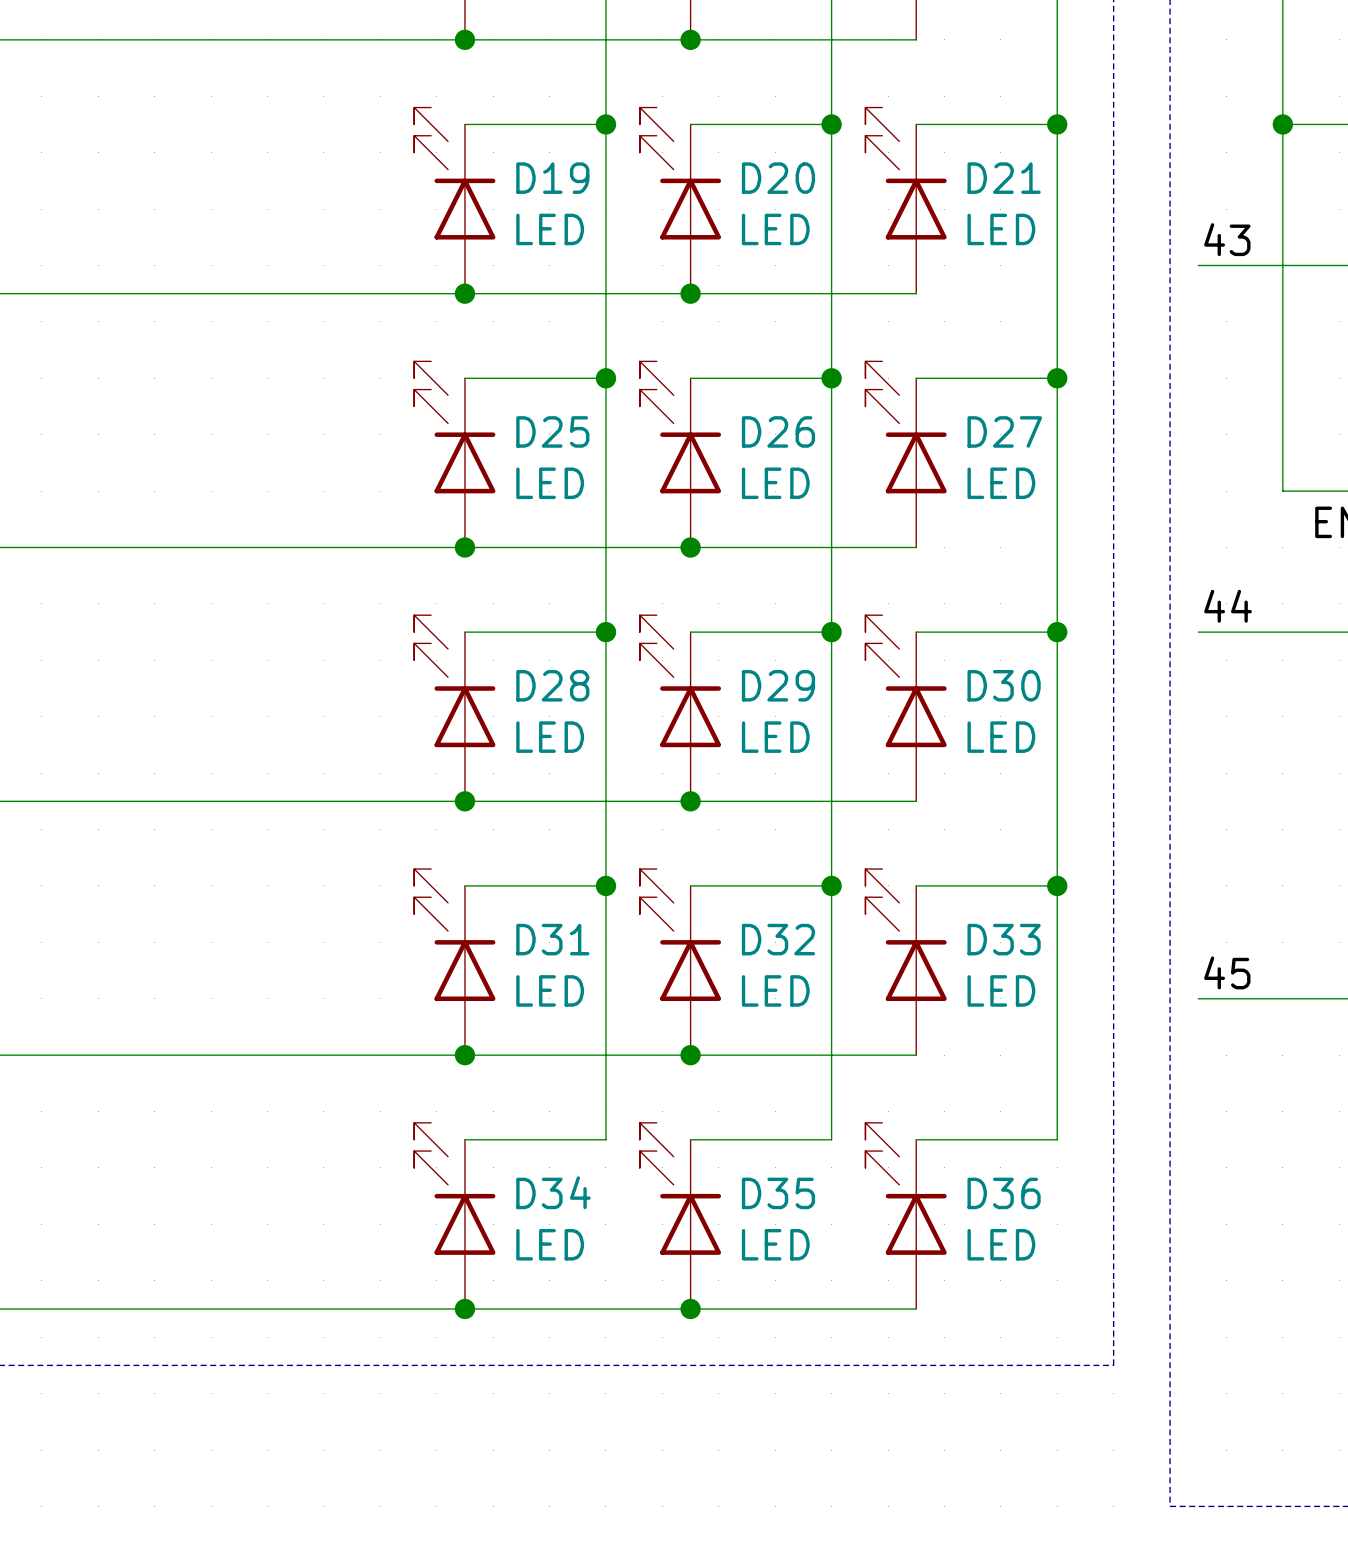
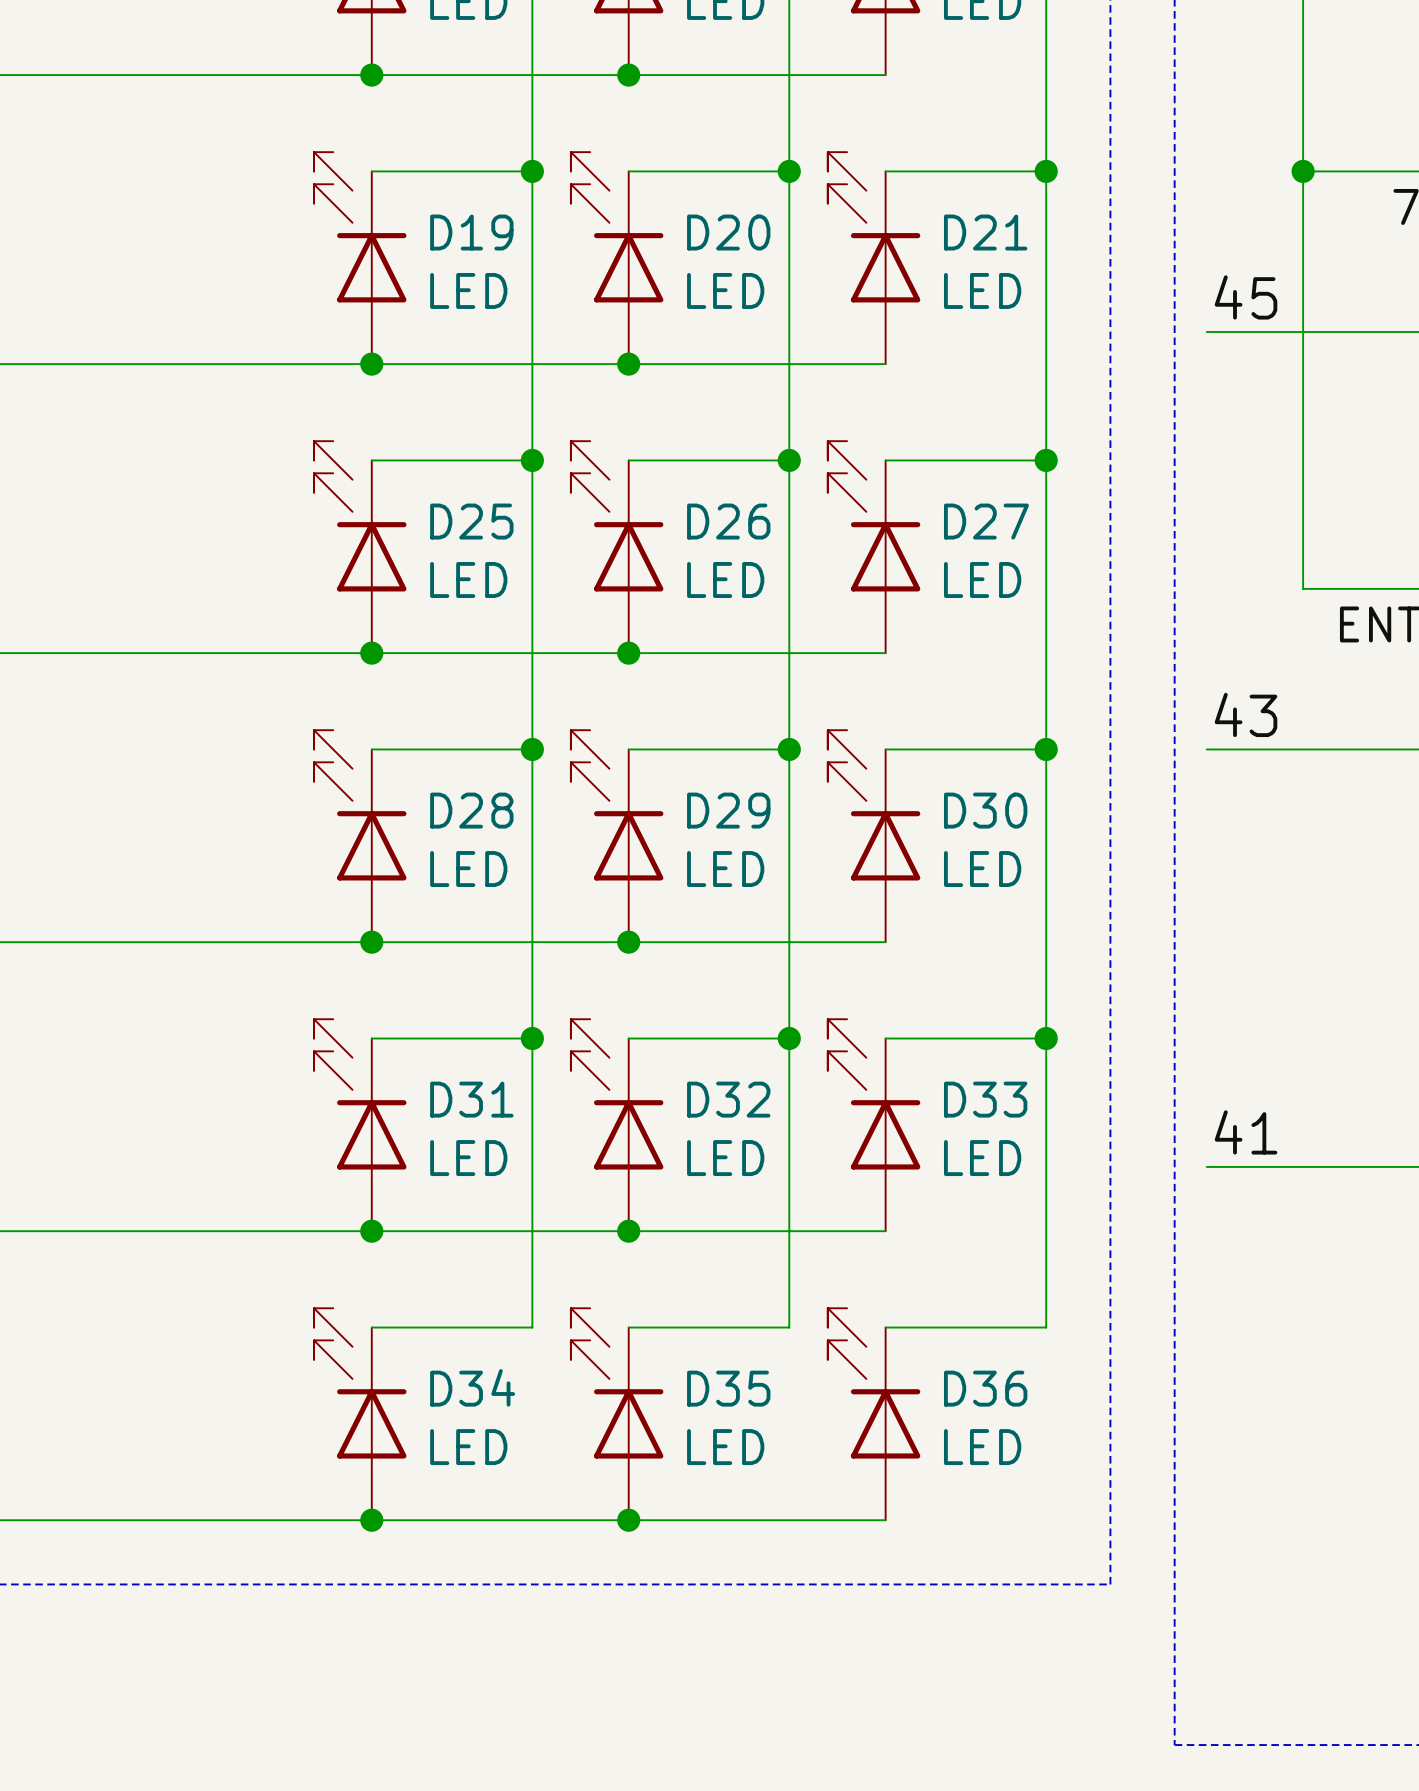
label: 43 (1227, 239) -> 45 (1246, 297)
label: 44 (1228, 606) -> 43 (1246, 714)
label: 45 (1227, 972) -> 41 (1246, 1132)

